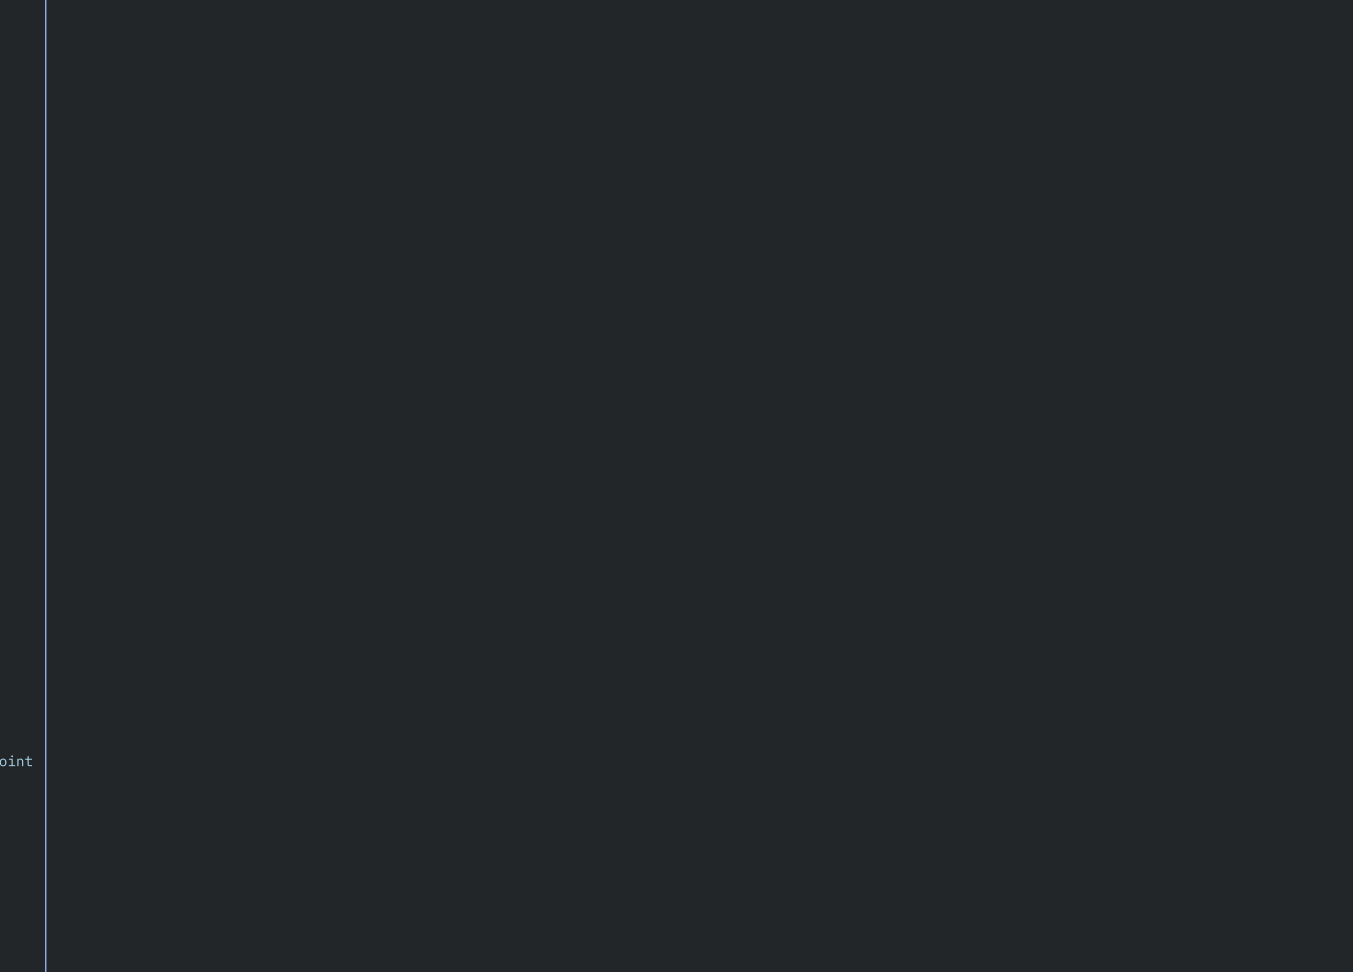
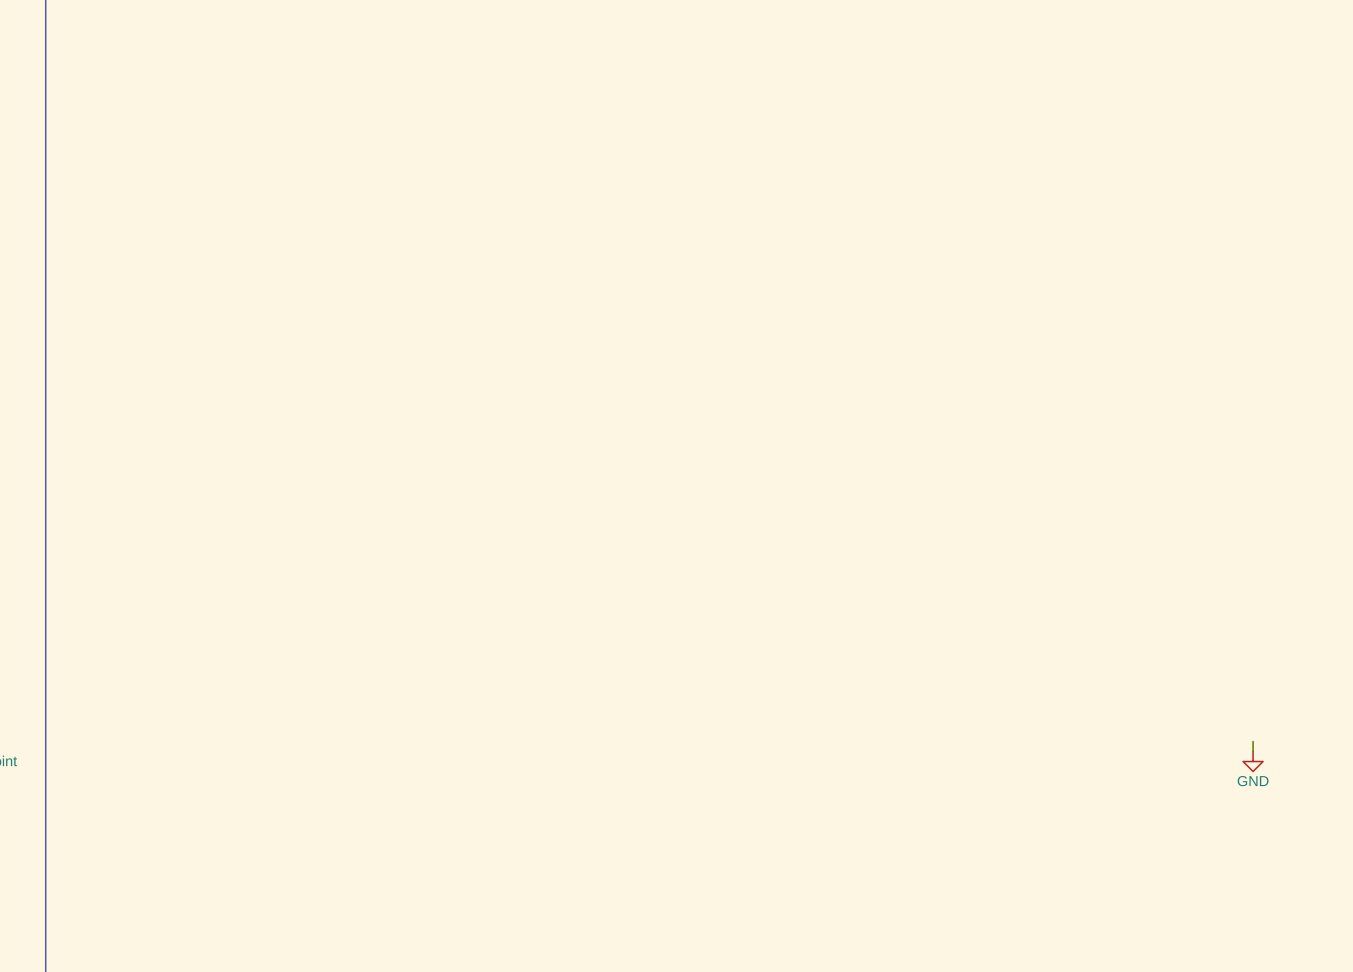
wire: none -> (1253, 741) (1253, 751)
power symbol: none -> GND (1253, 761)

